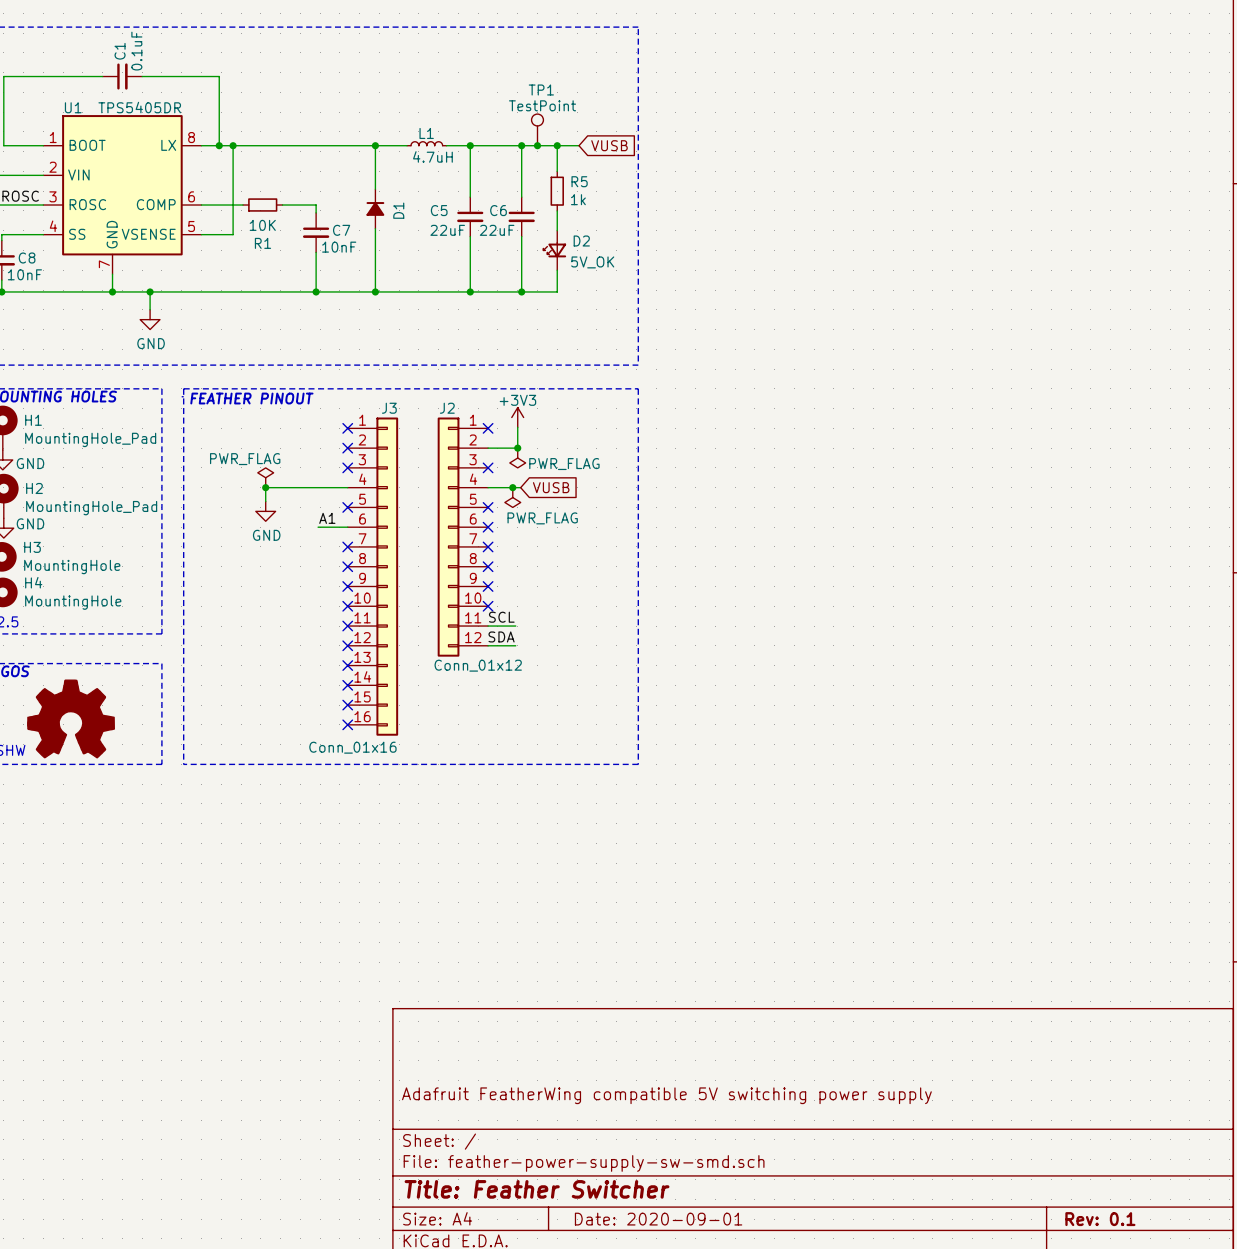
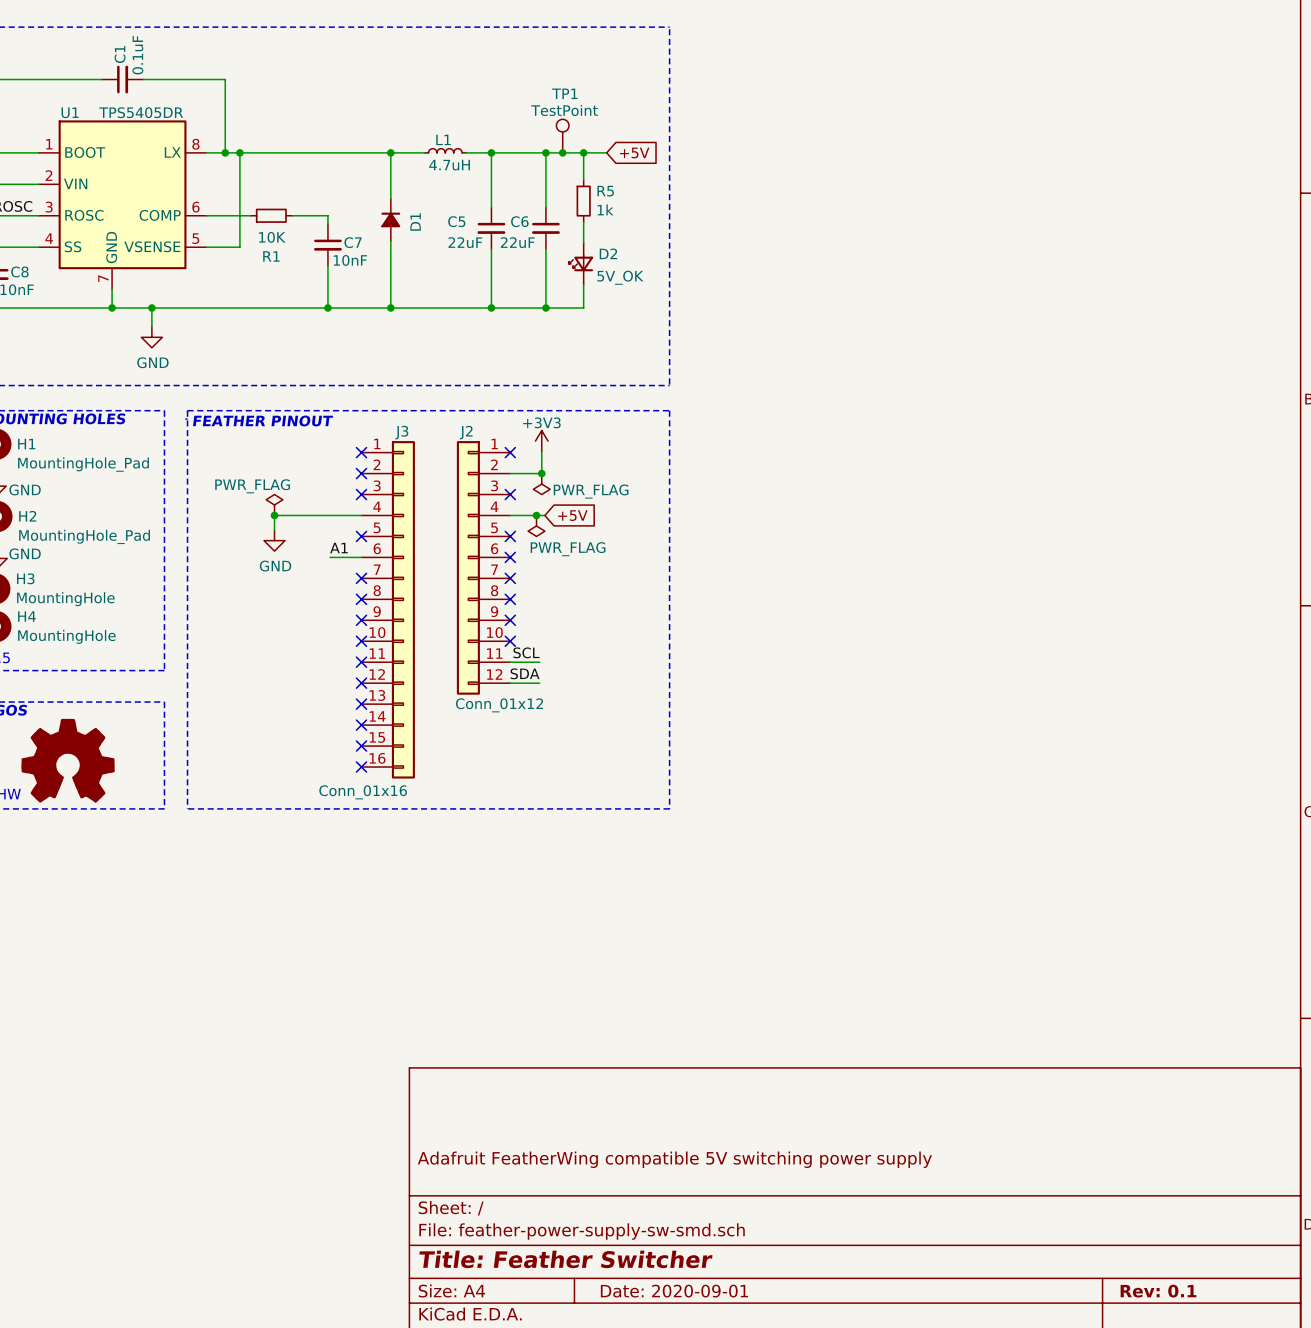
global label: VUSB (609, 145) -> +5V (634, 152)
global label: VUSB (551, 487) -> +5V (572, 515)

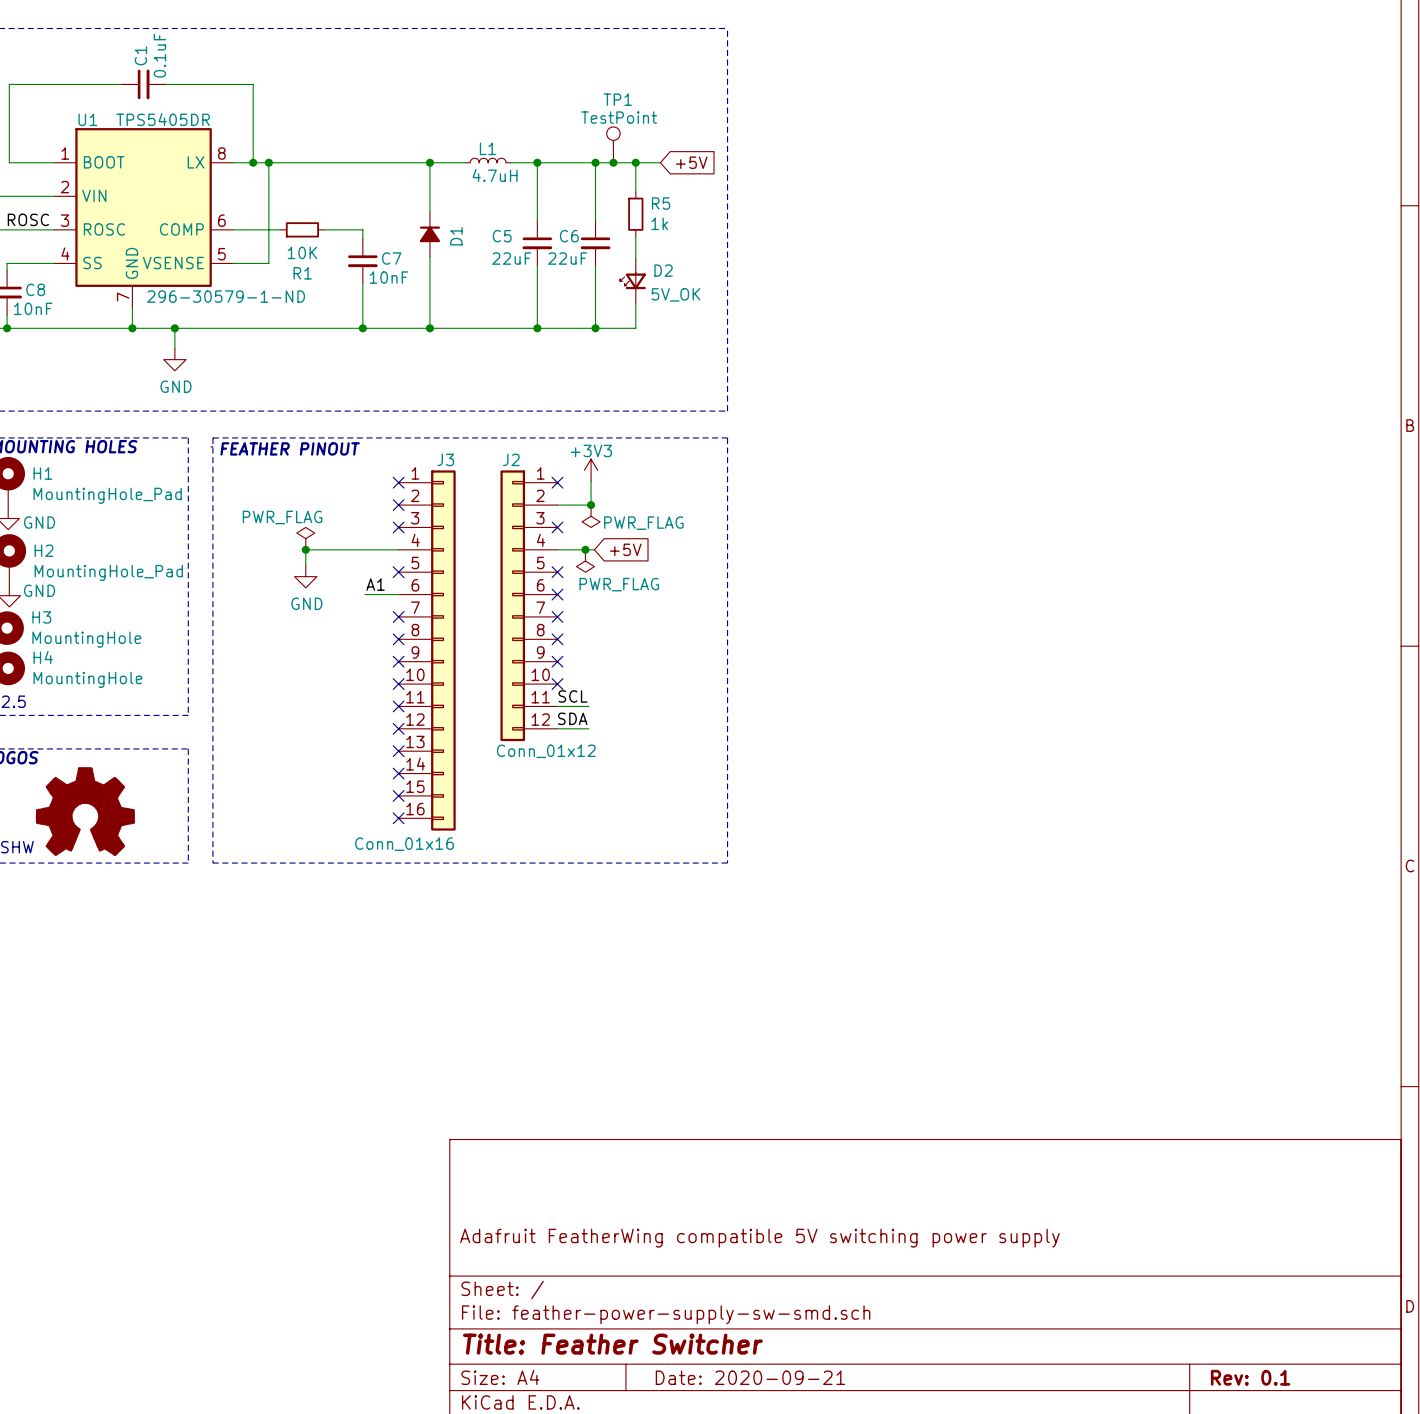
U1 text: none -> 296-30579-1-ND (226, 296)
title block: Date: 2020-09-01 (674, 1291) -> Date: 2020-09-21 (750, 1377)

